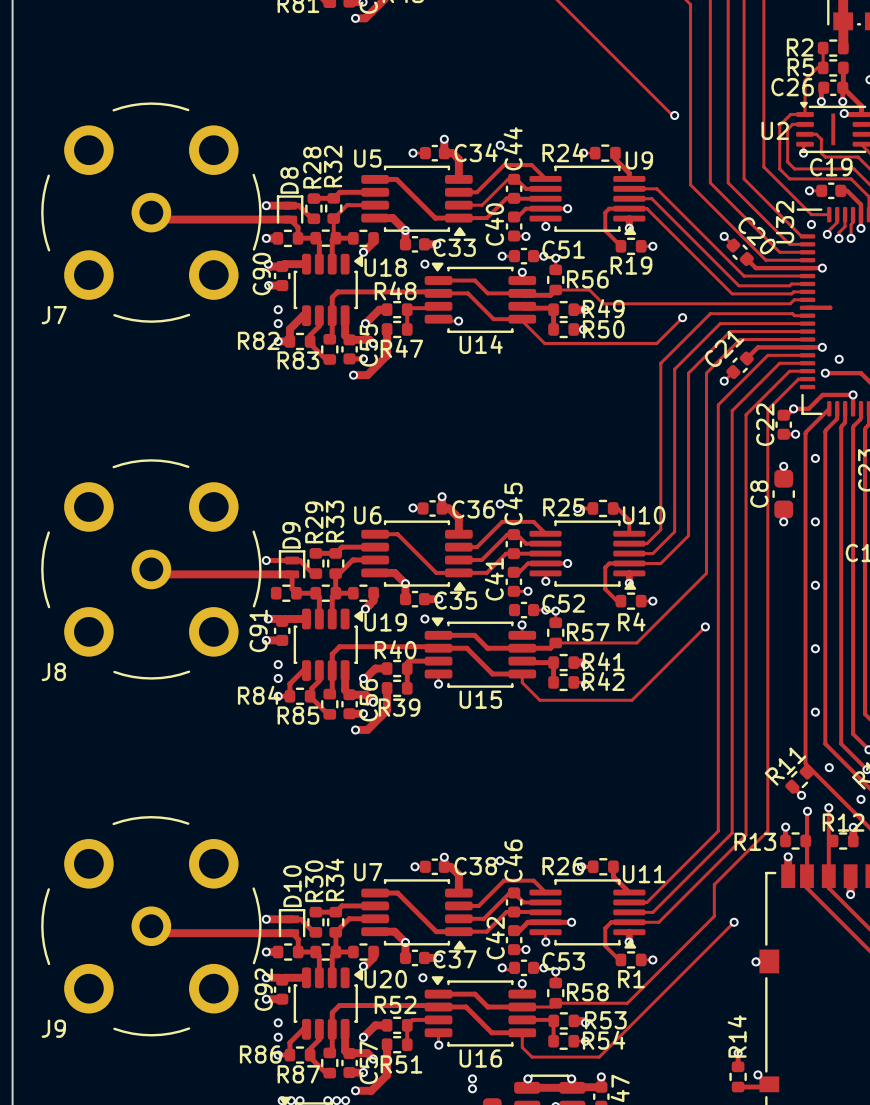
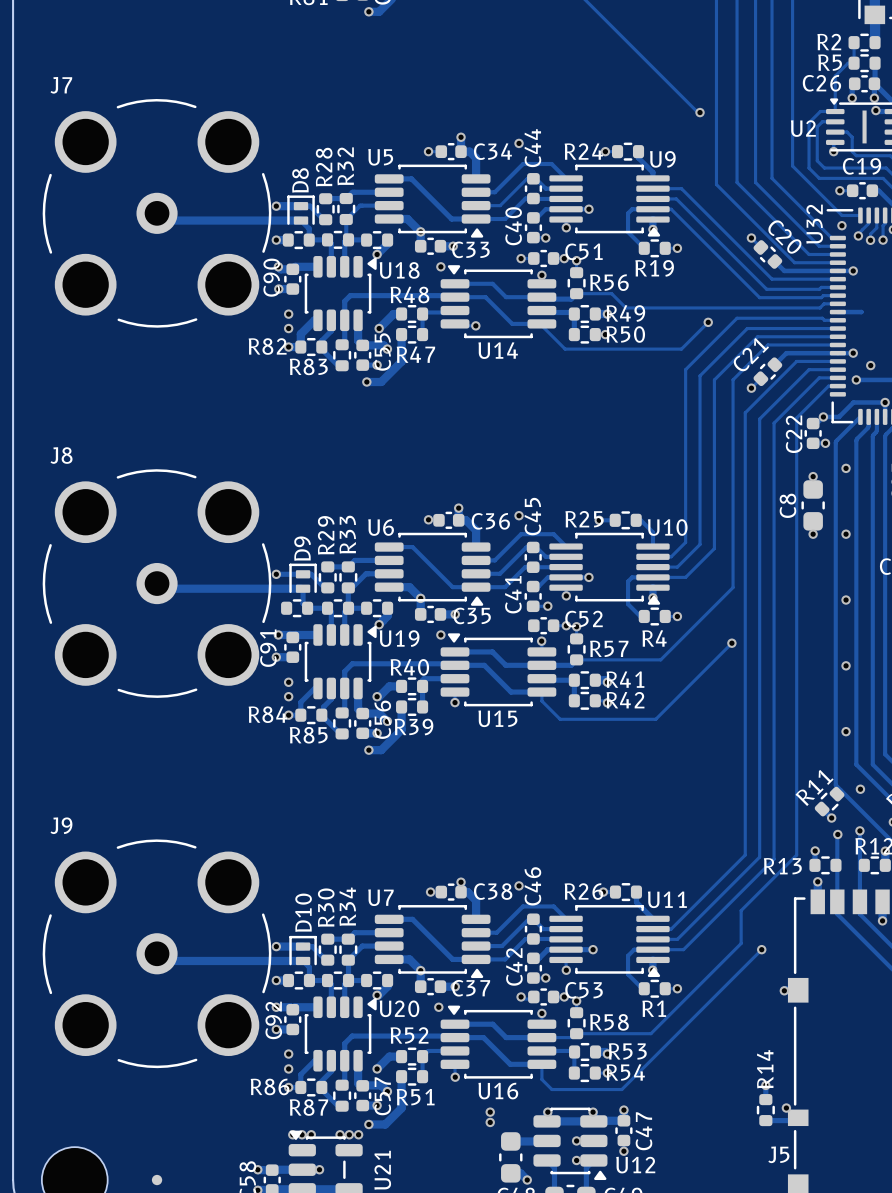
J7 footprint: [41, 102, 262, 323] -> [42, 98, 272, 328]
J7 name position: J7 (54, 315) -> J7 (61, 85)
J8 footprint: [41, 459, 262, 680] -> [42, 469, 272, 698]
J8 name position: J8 (53, 671) -> J8 (61, 455)
J9 footprint: [41, 816, 262, 1037] -> [42, 839, 272, 1069]
J9 name position: J9 (53, 1028) -> J9 (61, 825)

